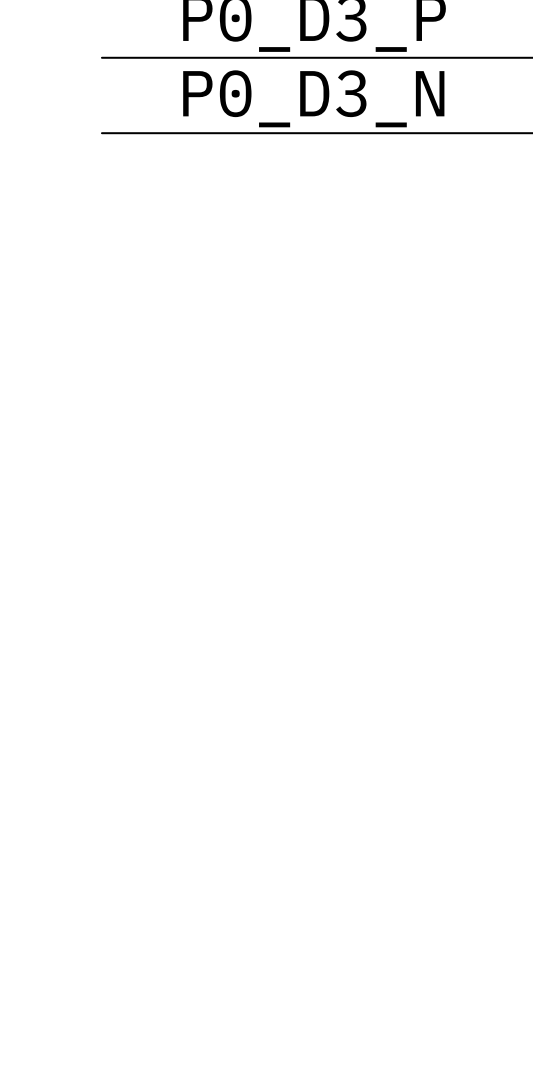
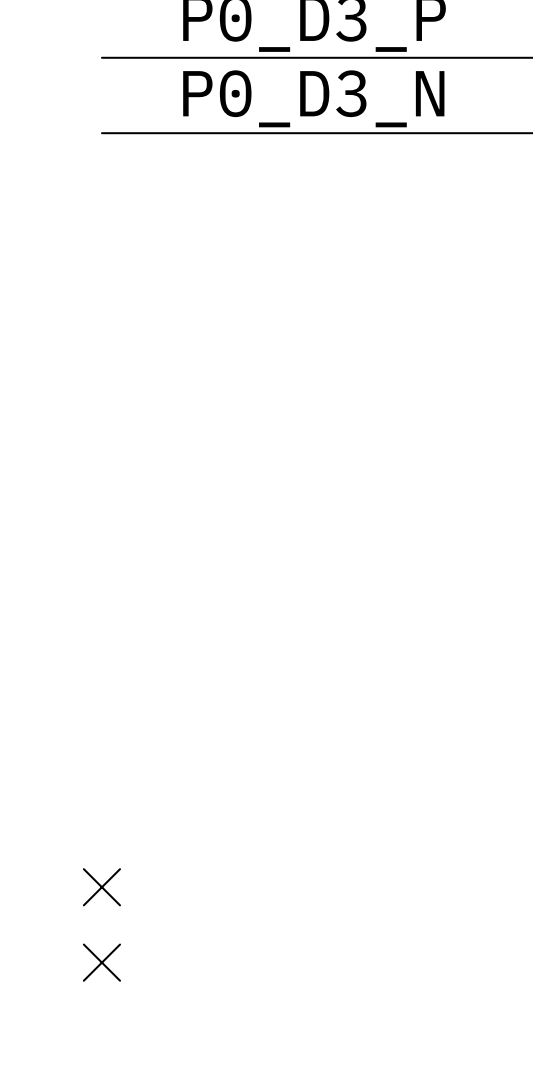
no-connect mark: none -> (101, 887)
no-connect mark: none -> (101, 962)

